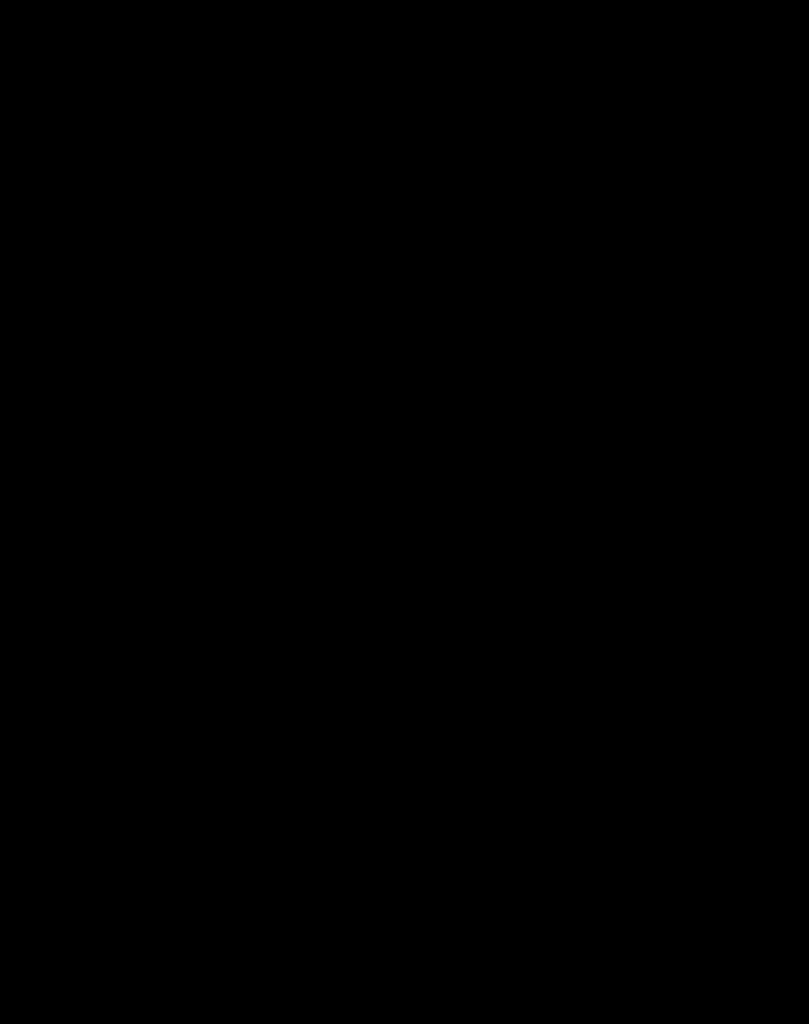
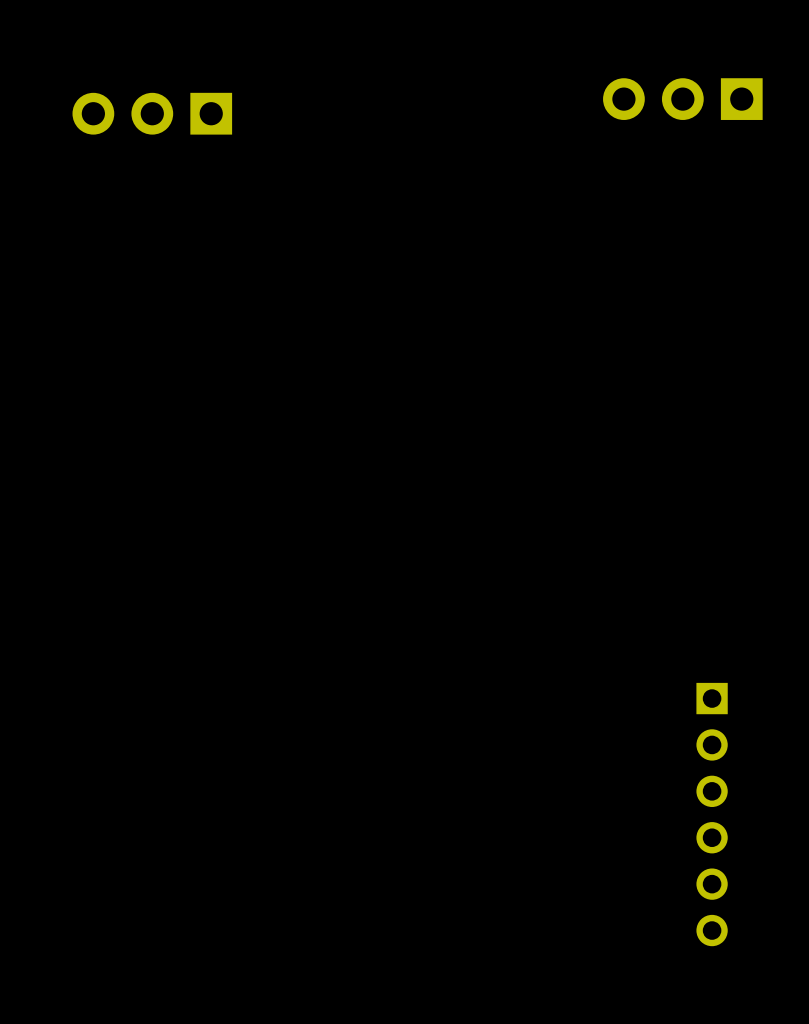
part: none -> (682, 99)
part: none -> (152, 113)
part: none -> (712, 814)

